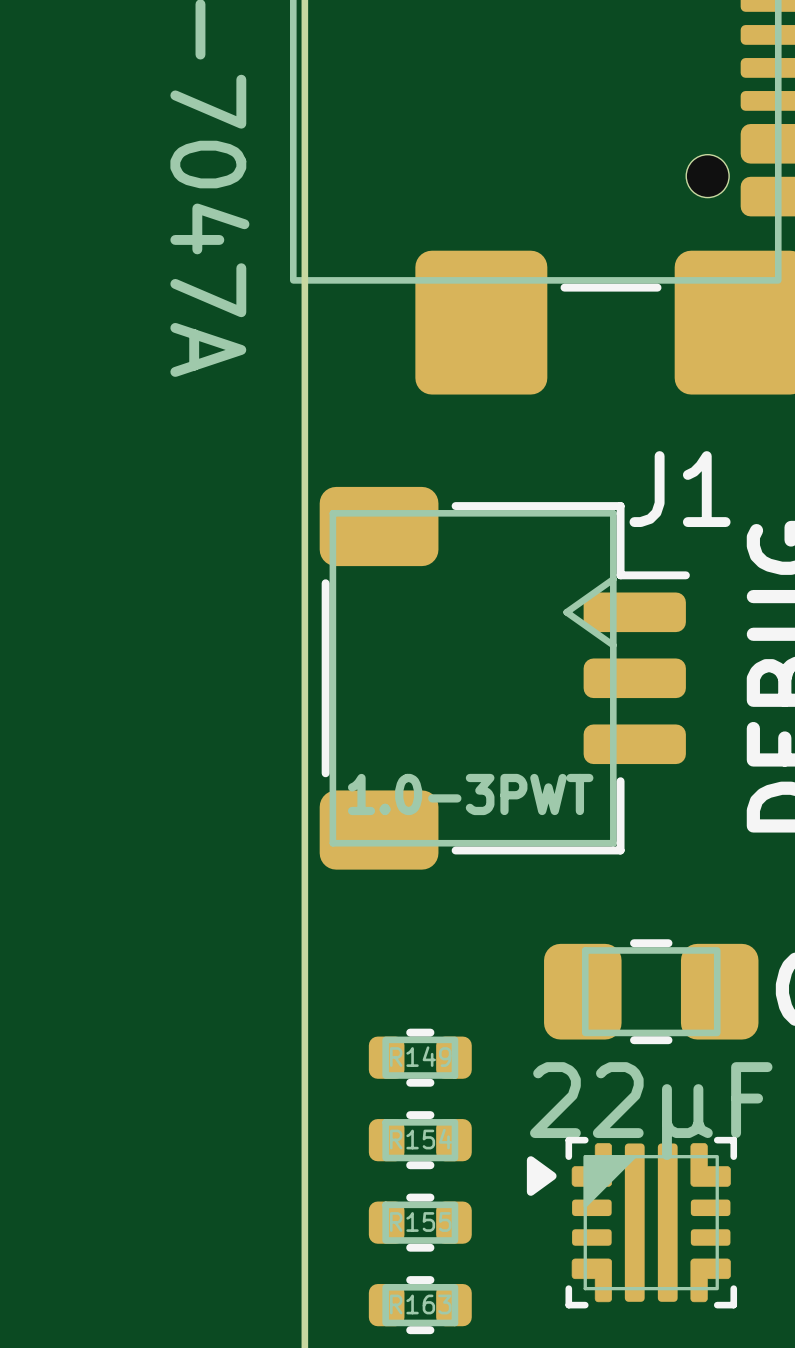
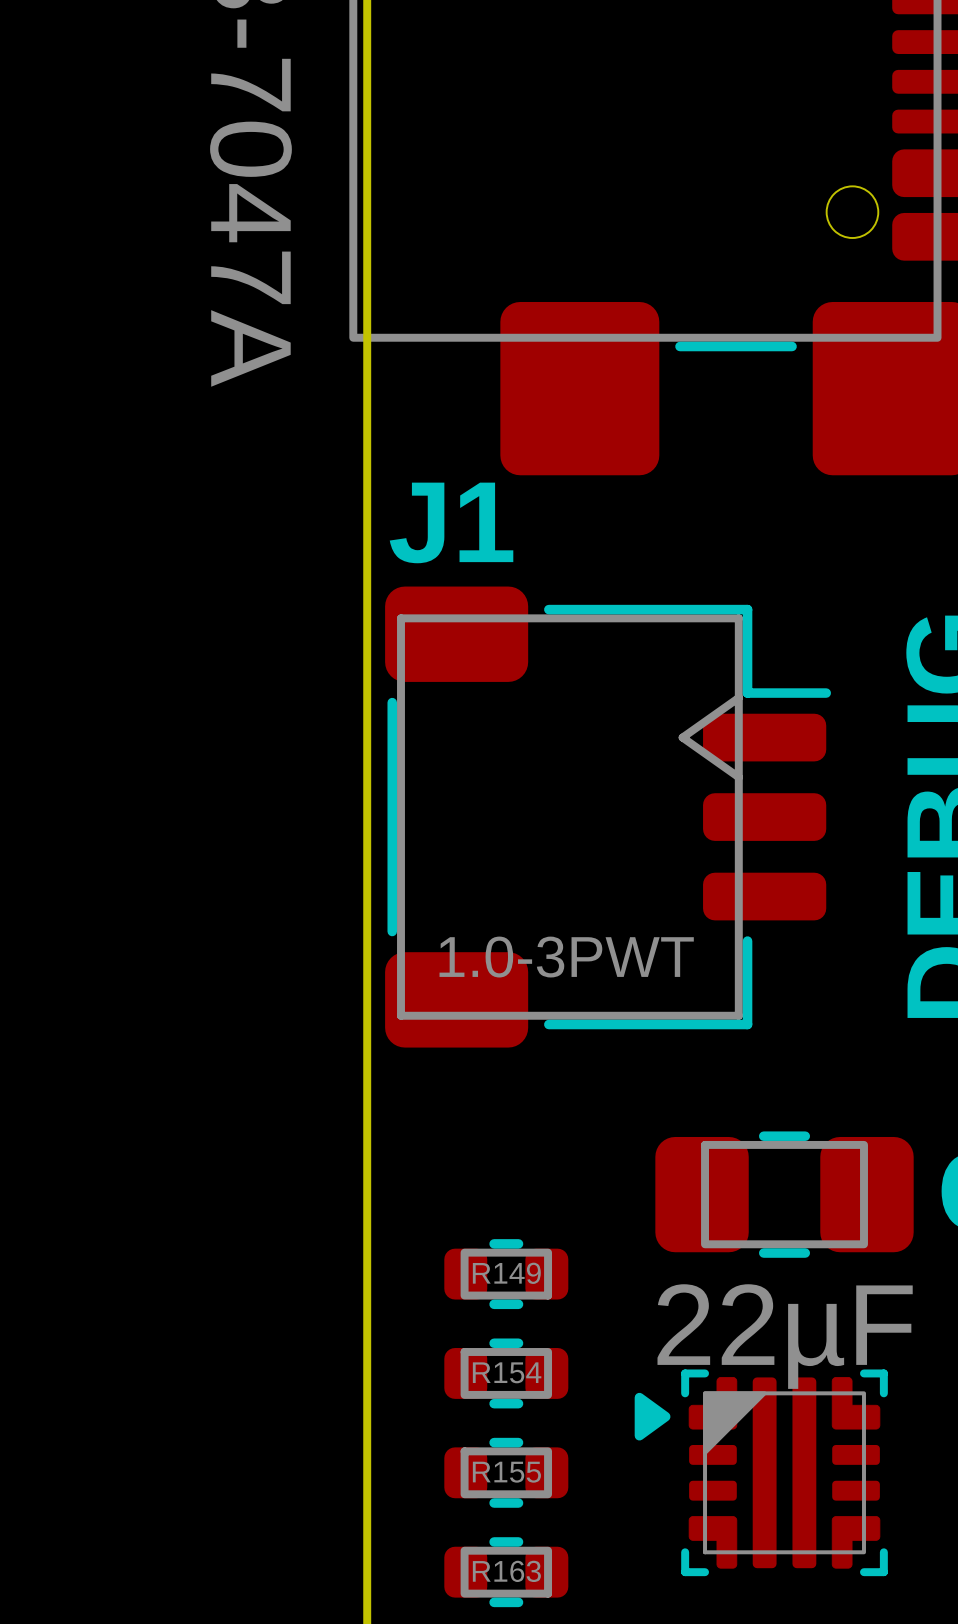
J1 name position: J1 (680, 489) -> J1 (451, 522)

